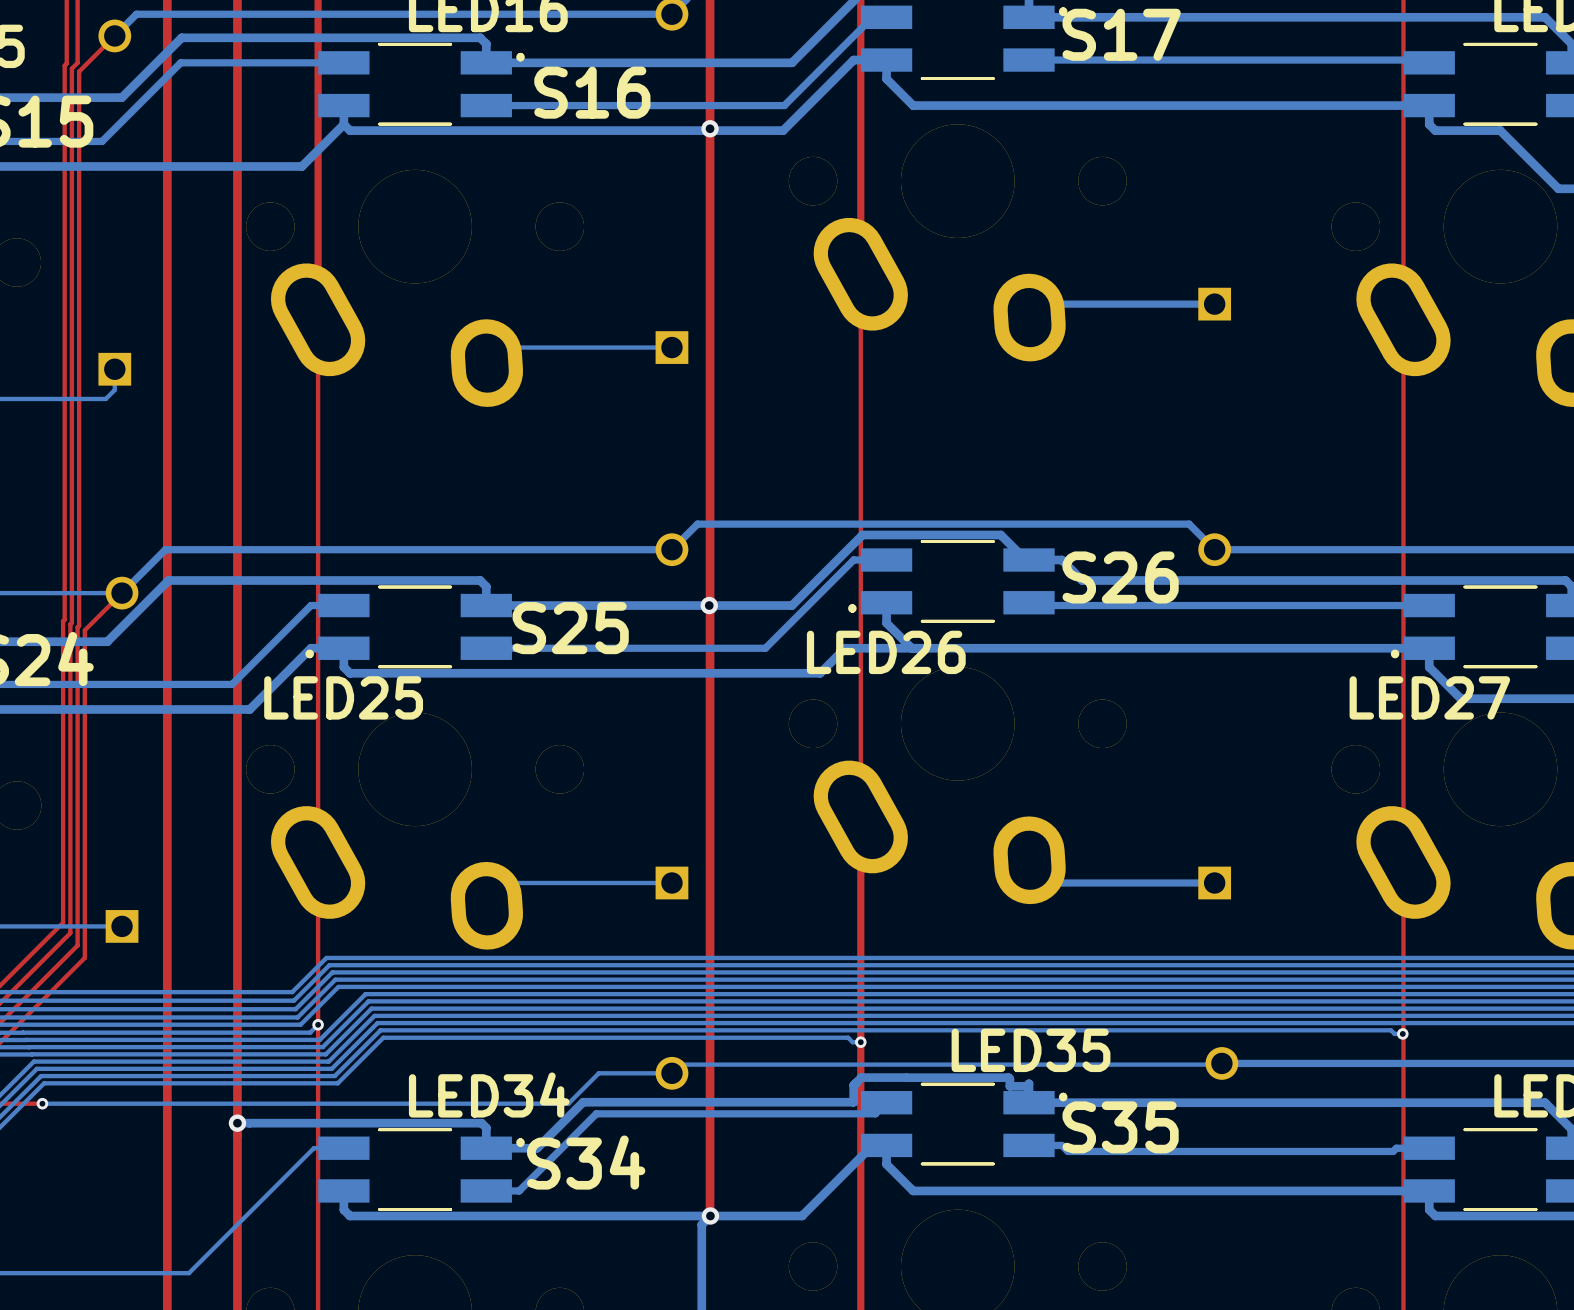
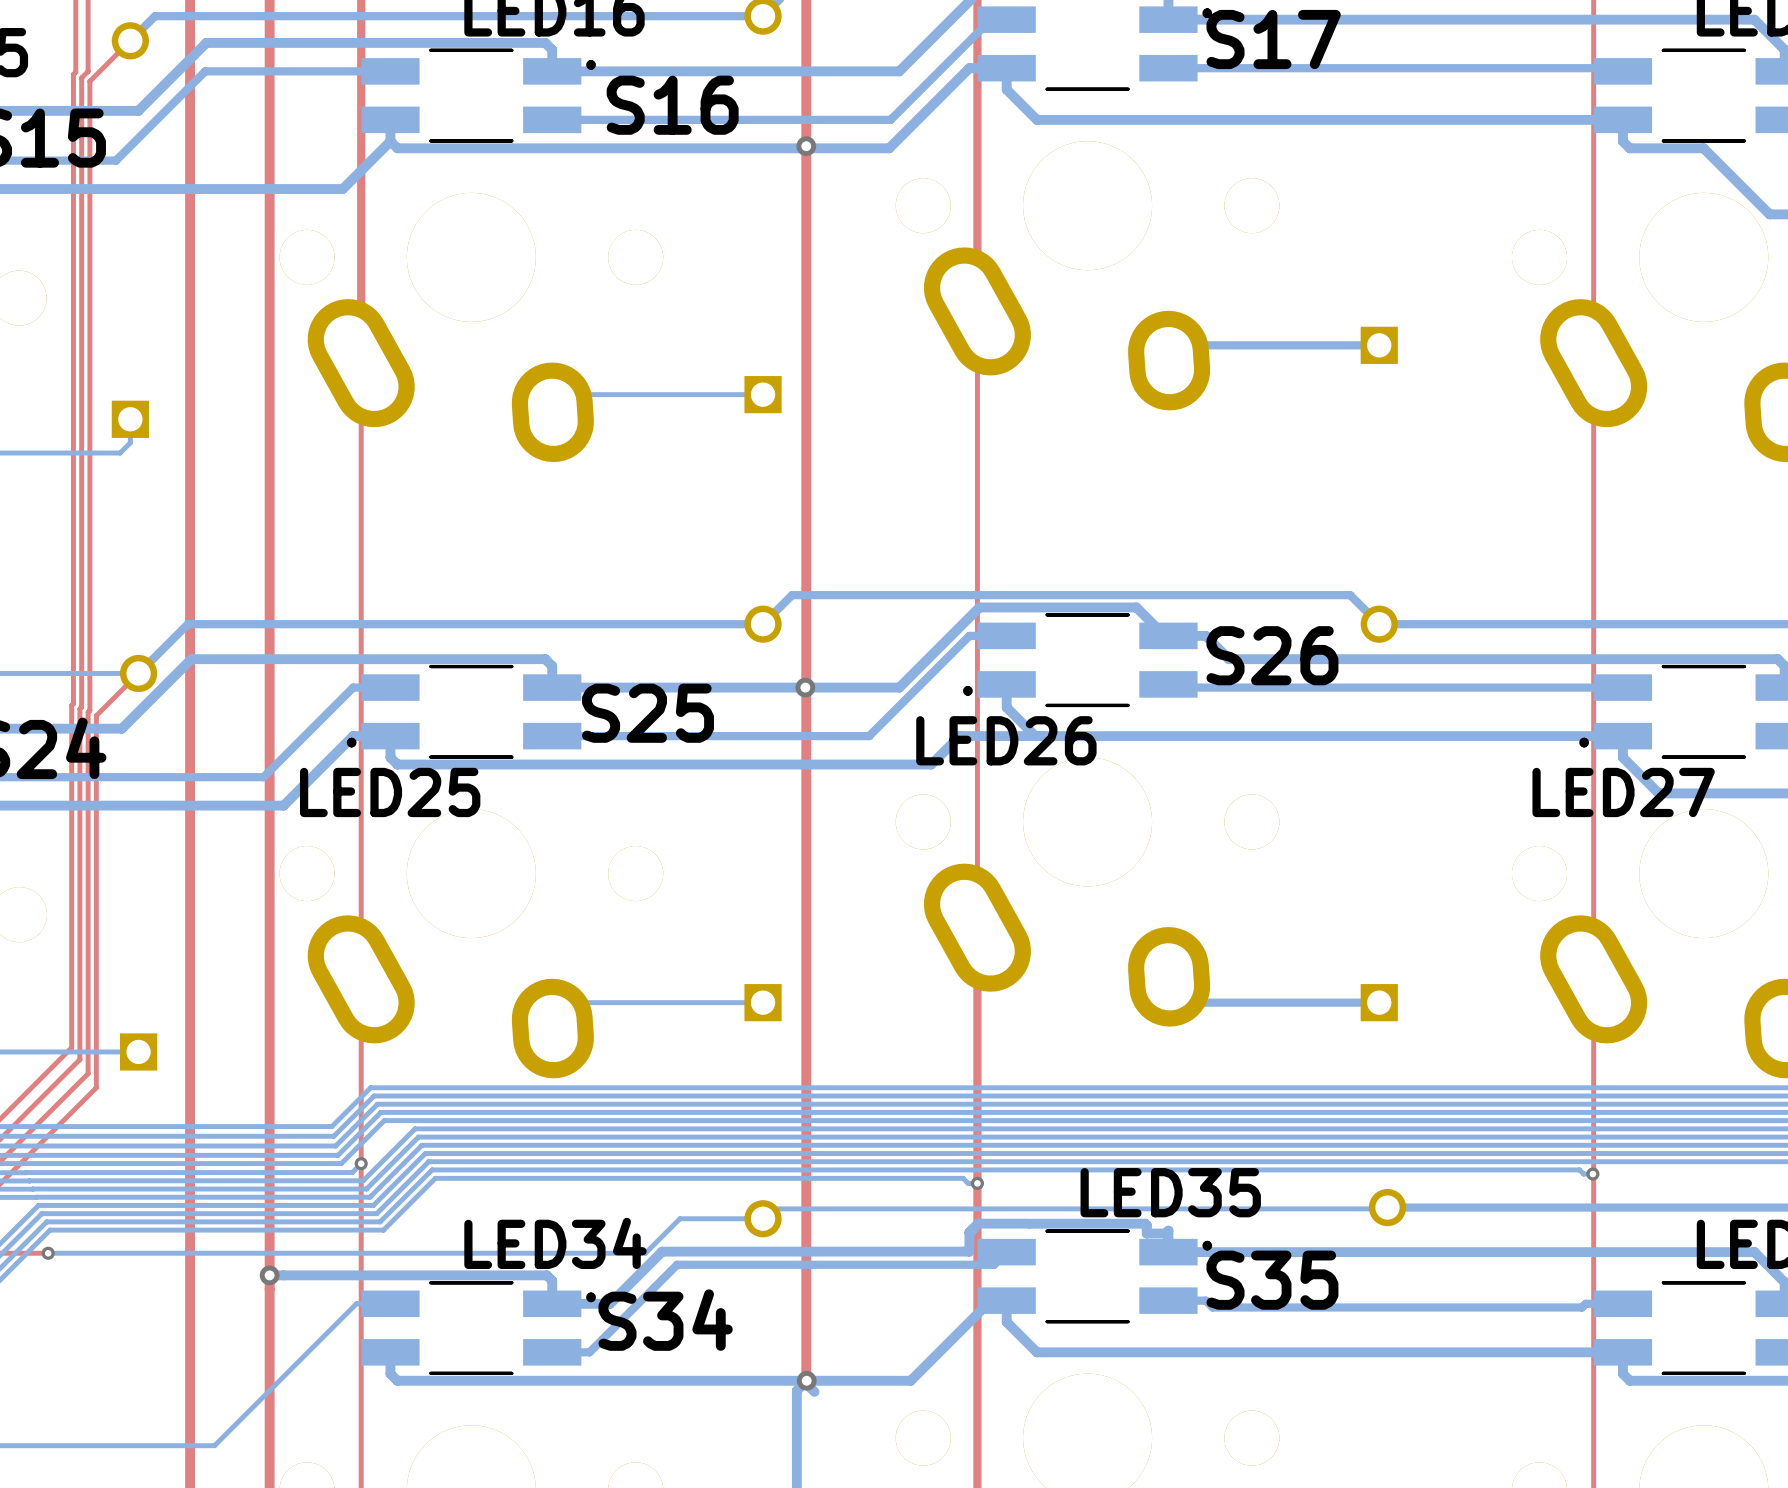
bottom track: none -> (807, 1385) (814, 1391)

